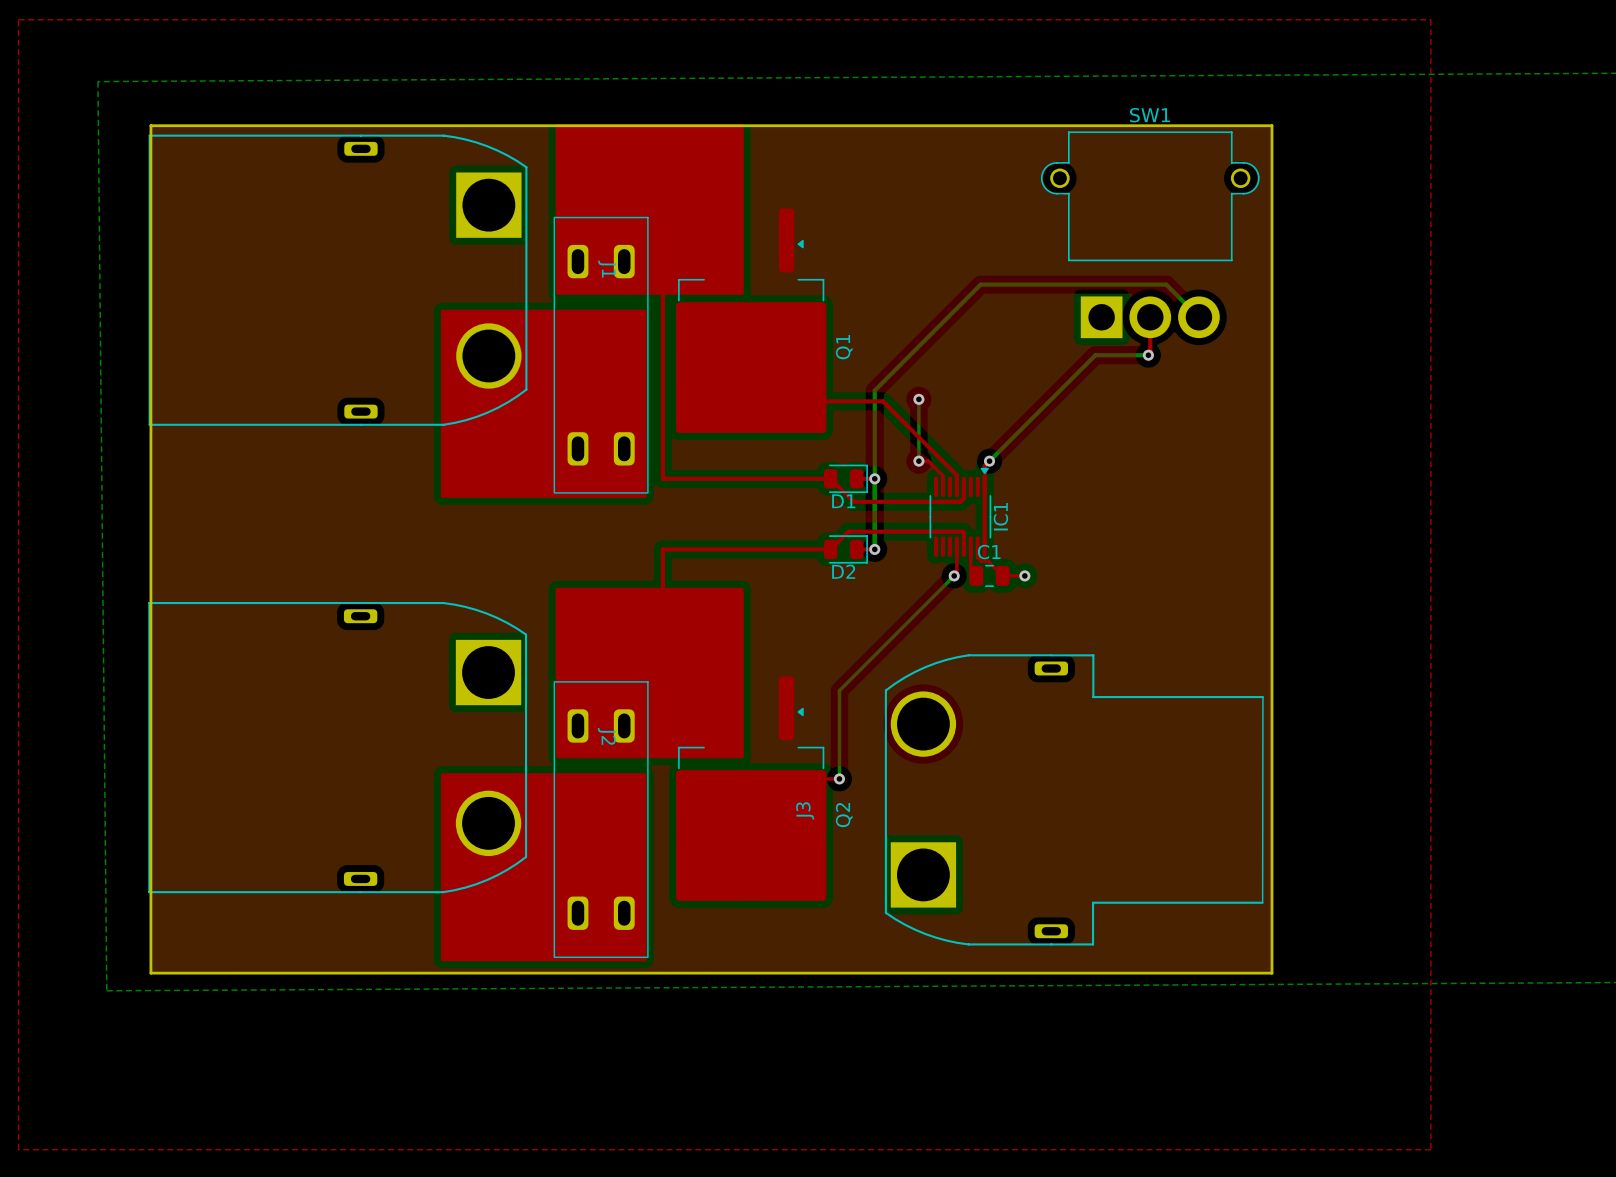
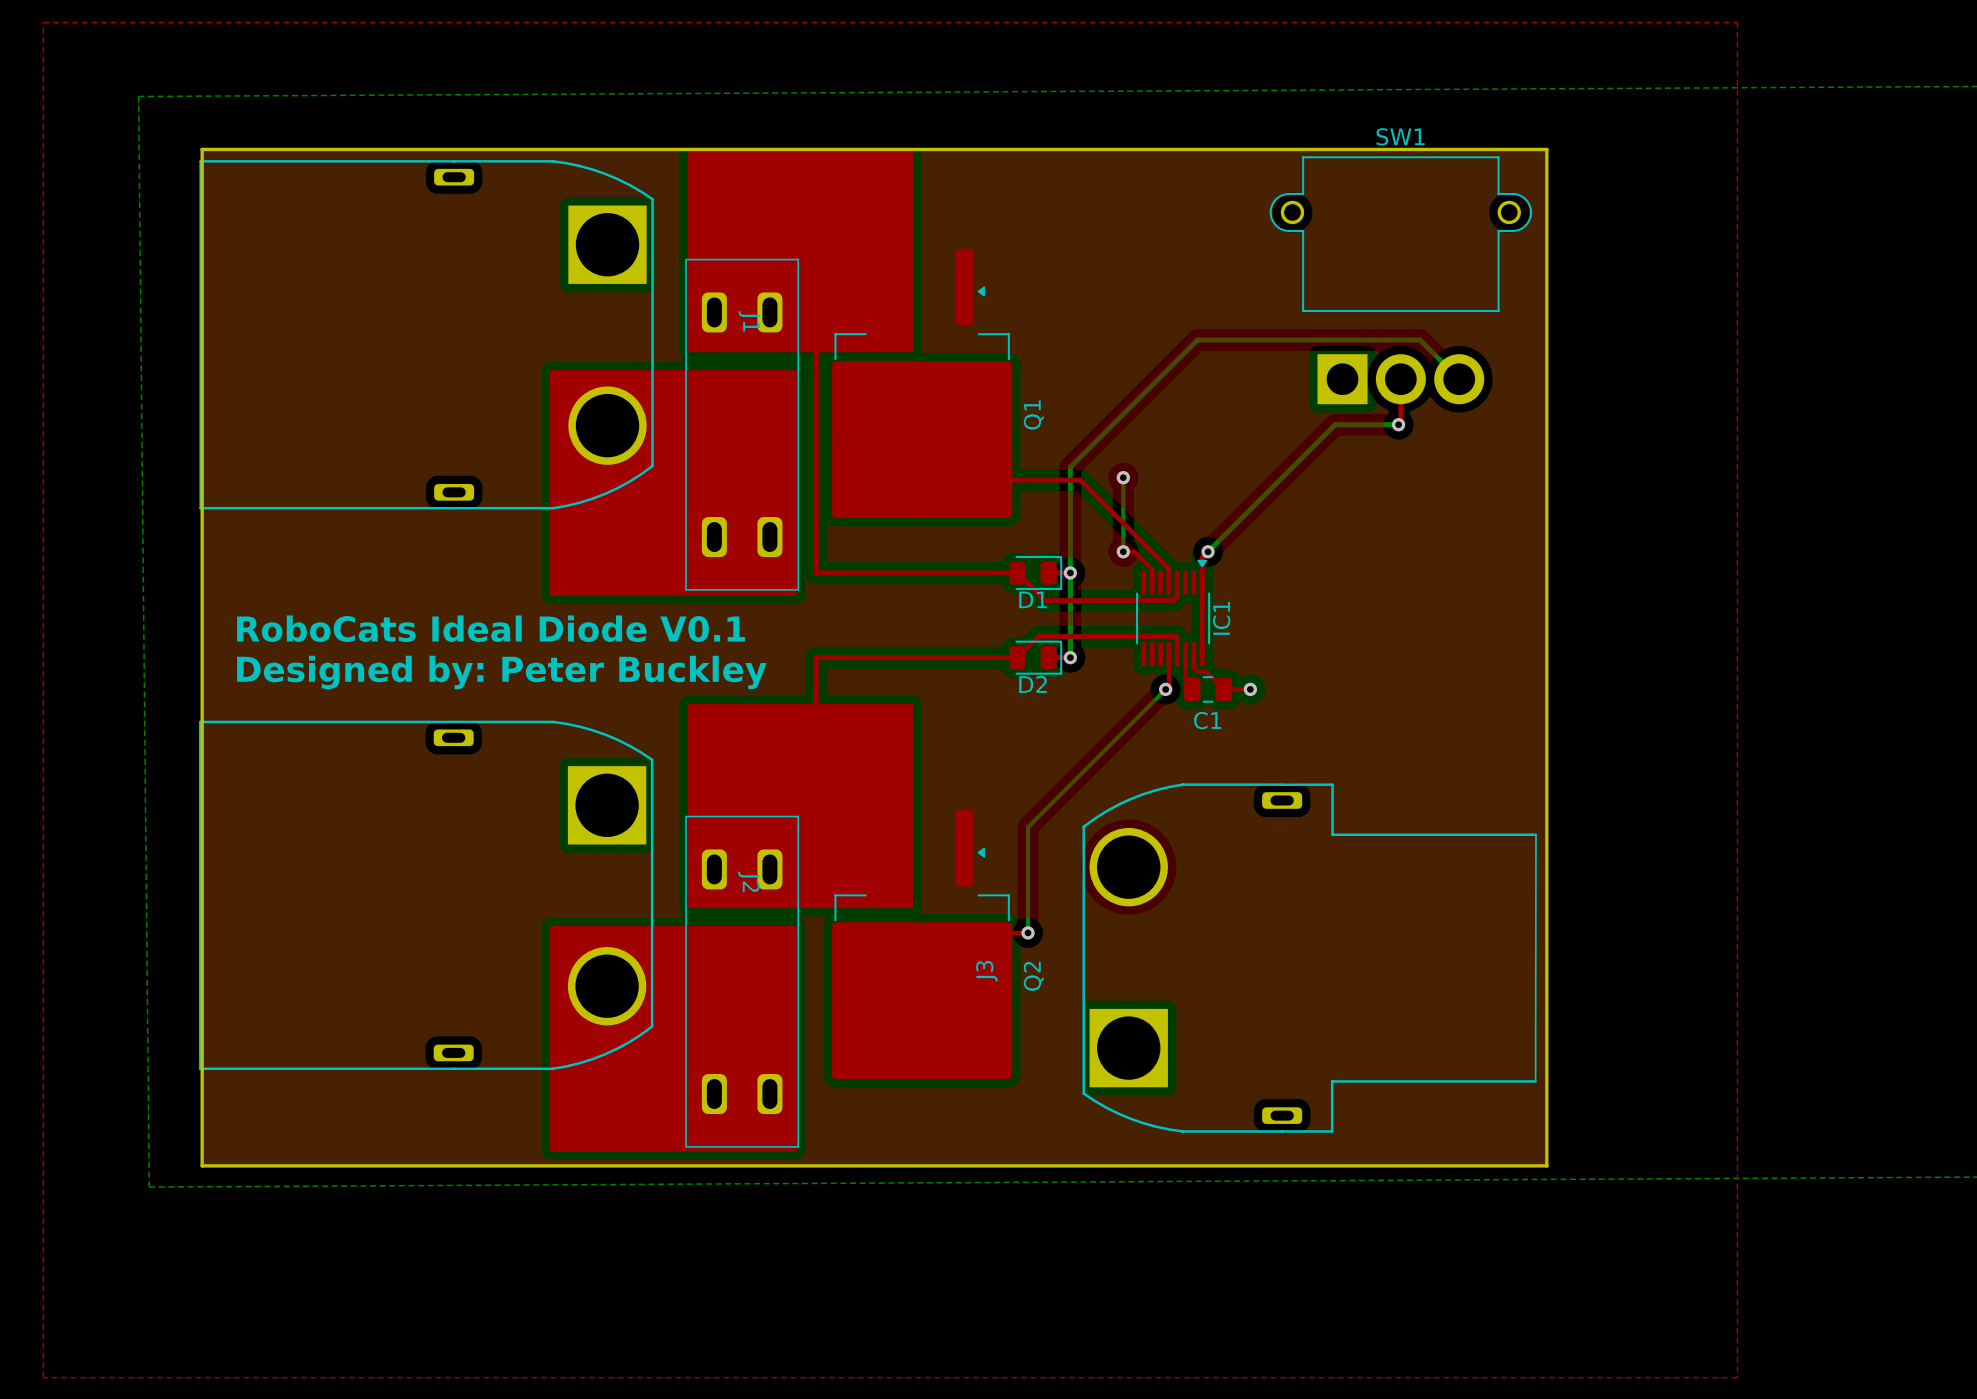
text: none -> RoboCats Ideal Diode V0.1 (491, 628)
C1 name position: C1 (989, 552) -> C1 (1207, 720)
text: none -> Designed by: Peter Buckley (501, 672)

